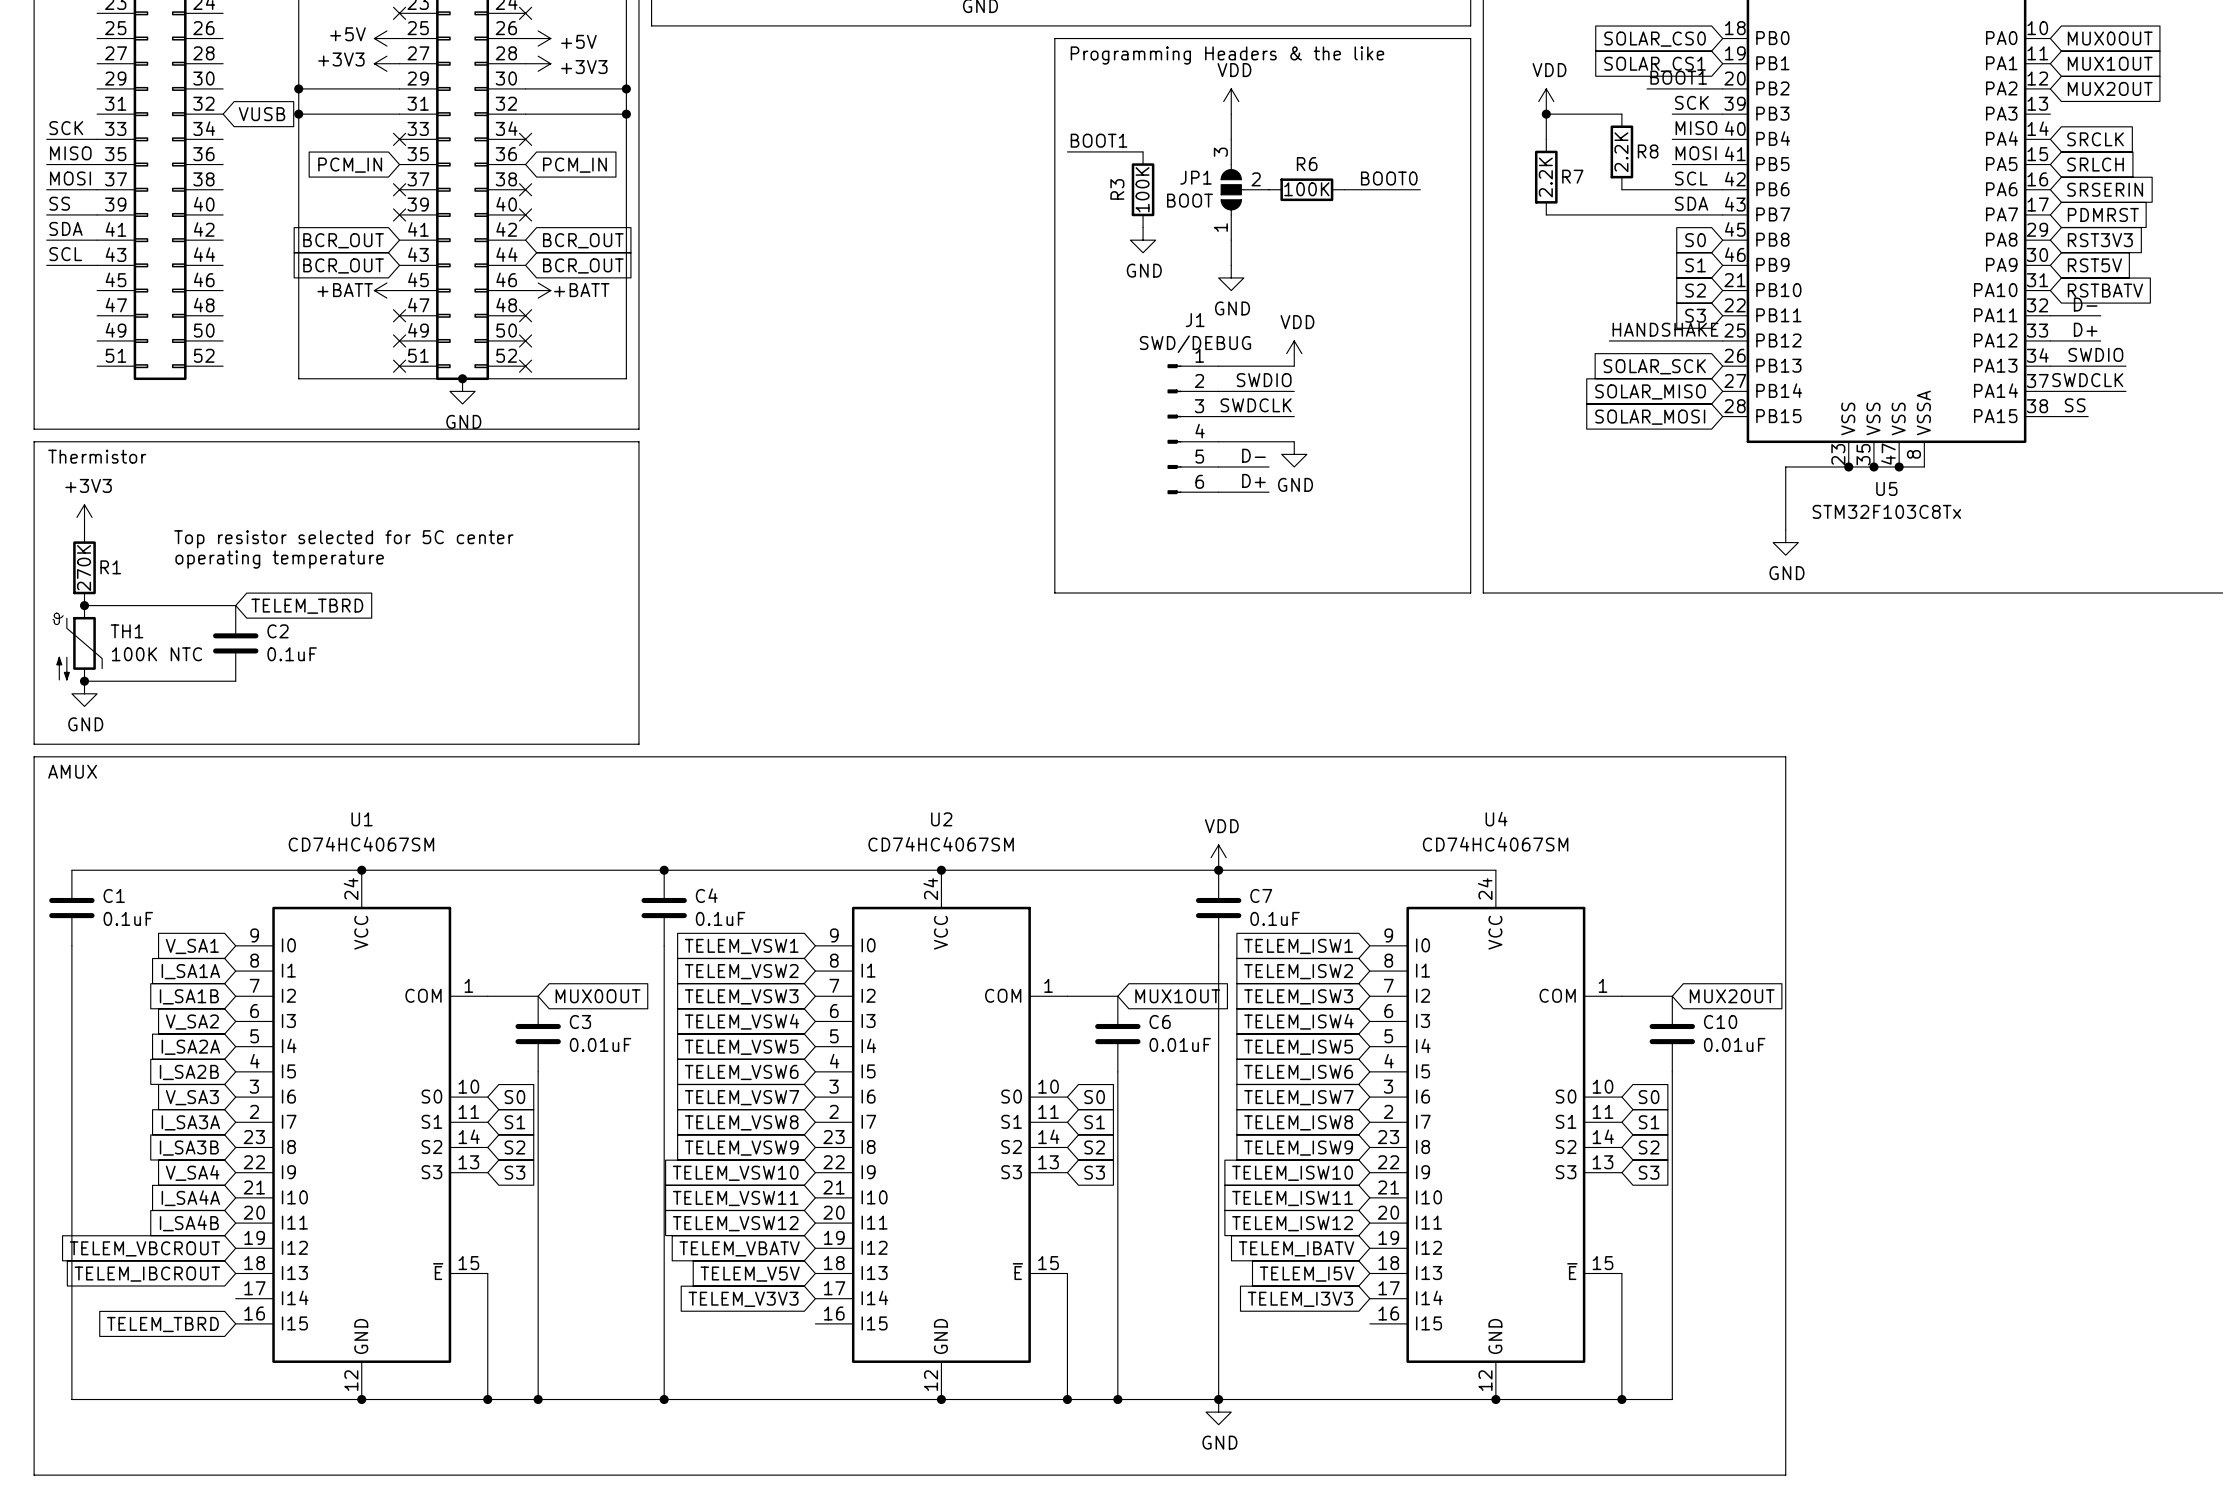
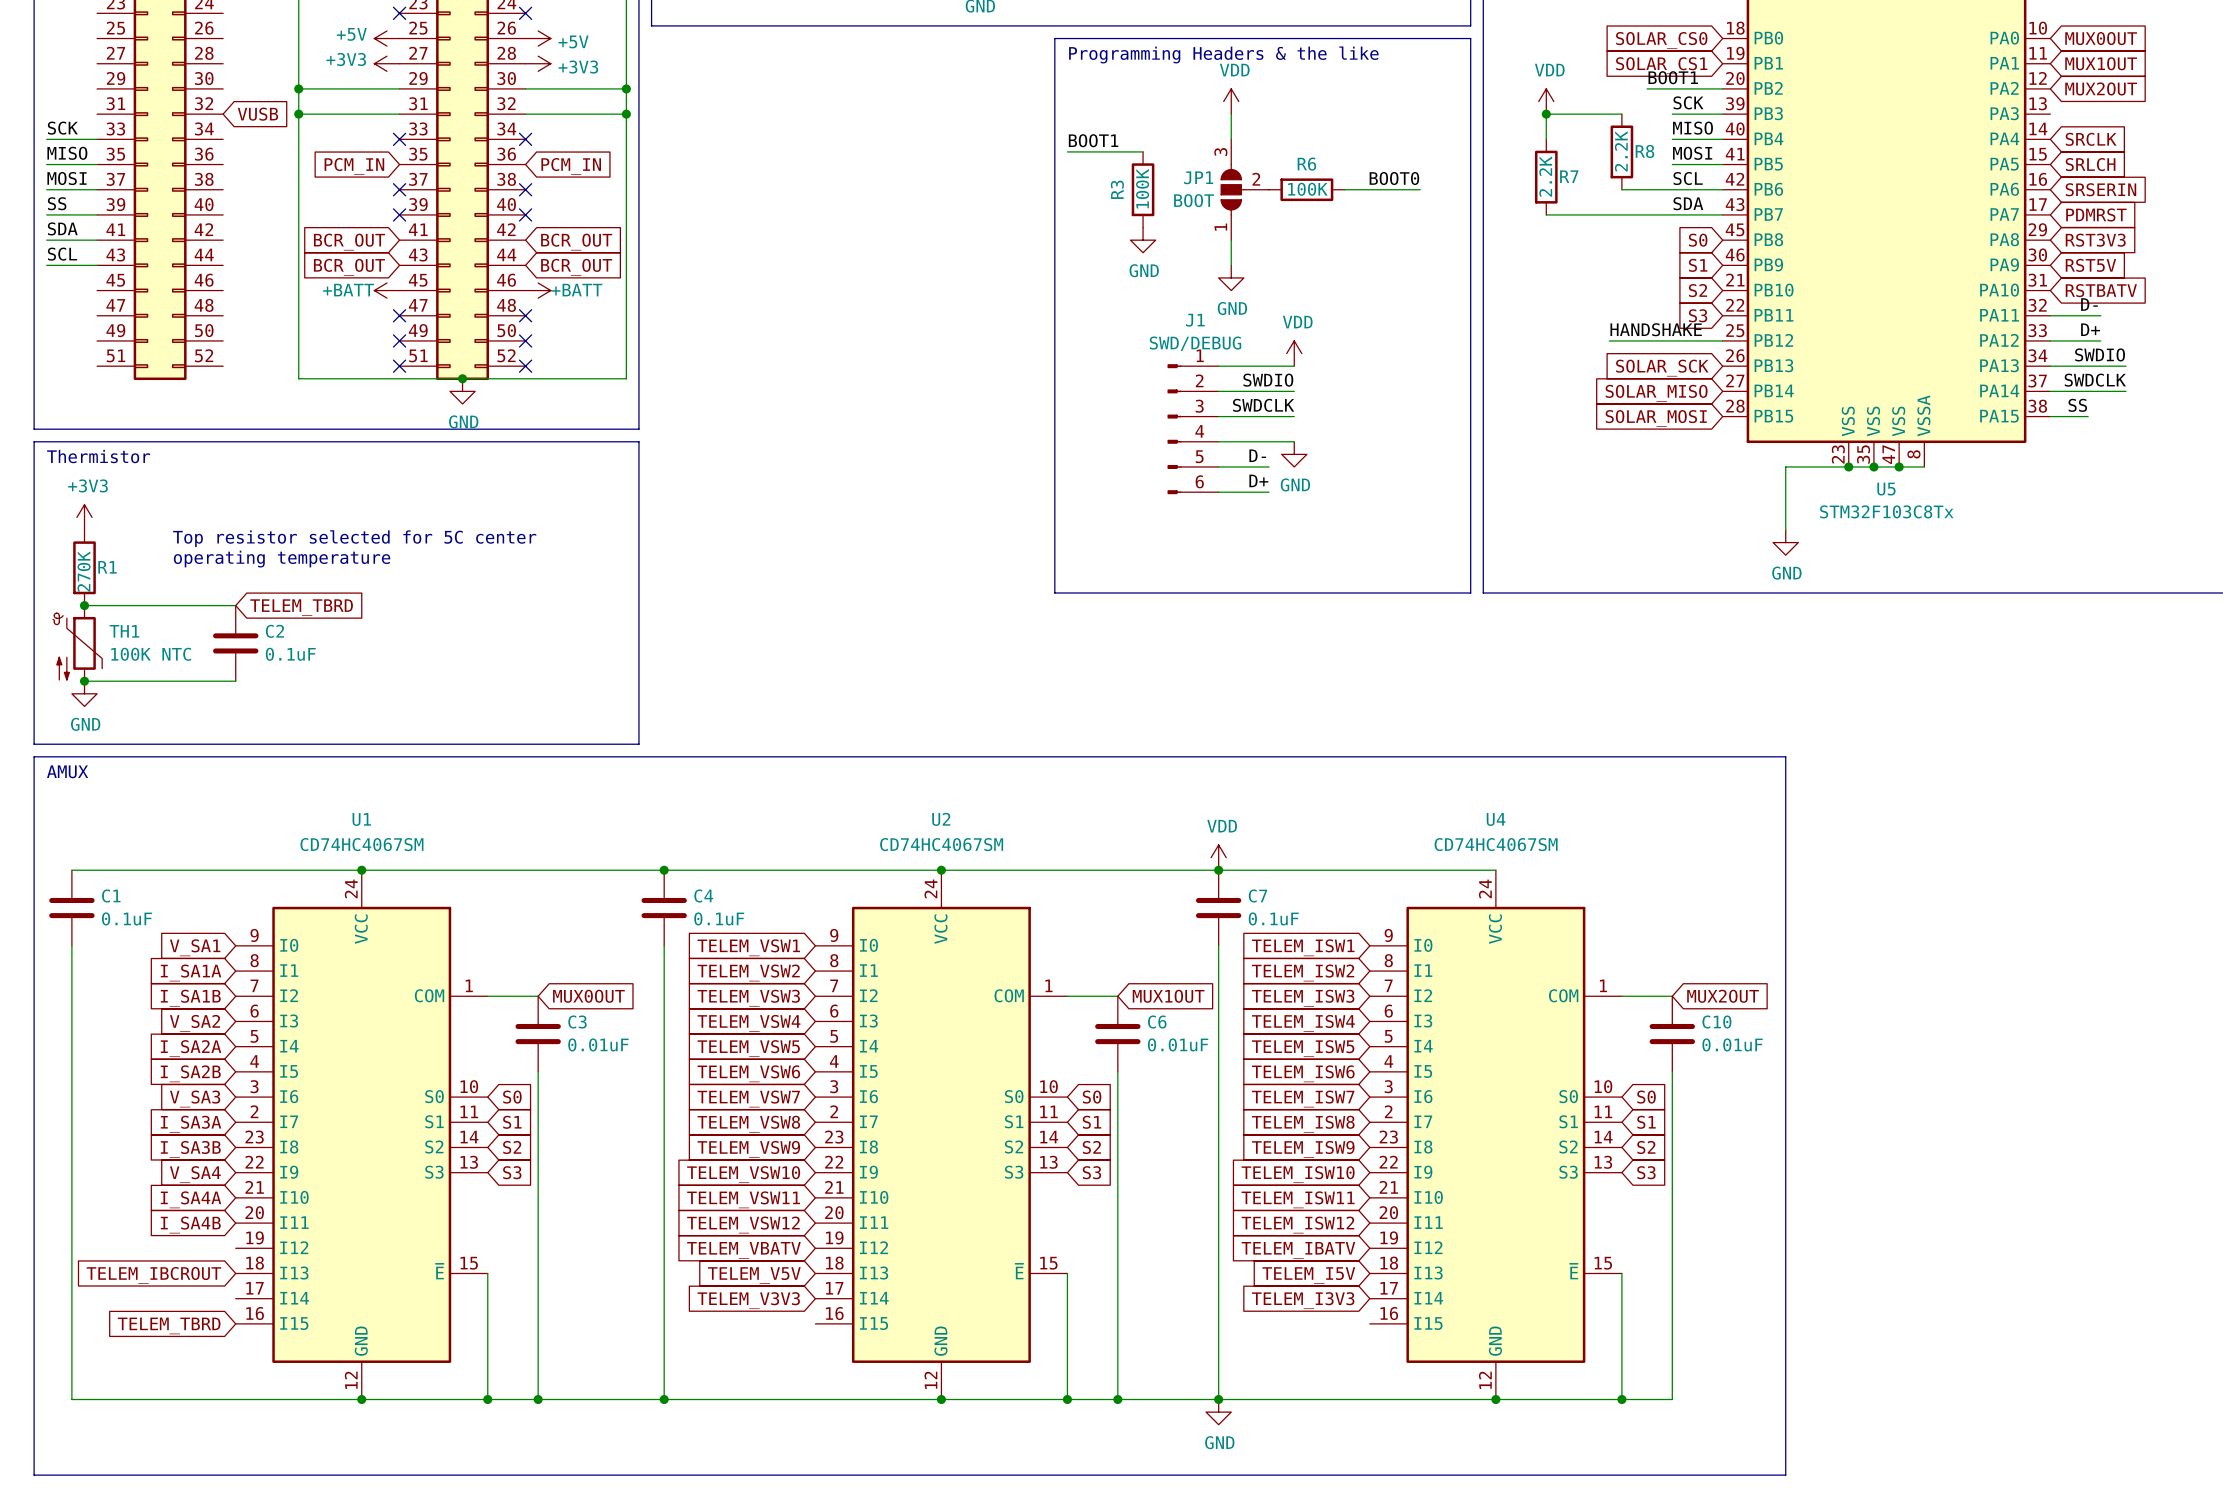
global label: TELEM_VBCROUT (144, 1248) -> none

